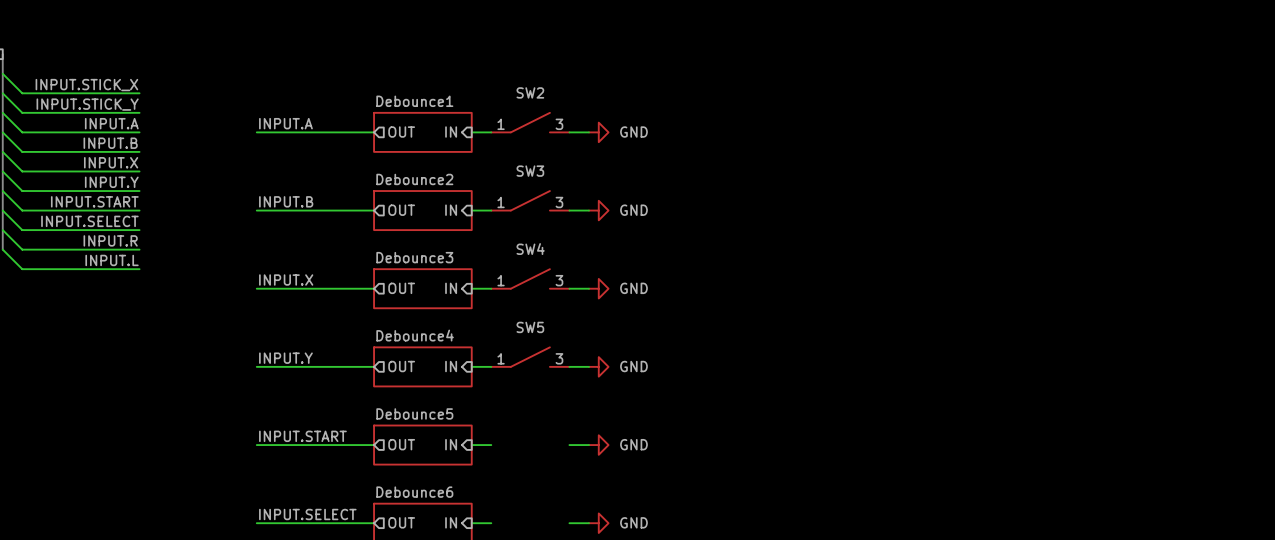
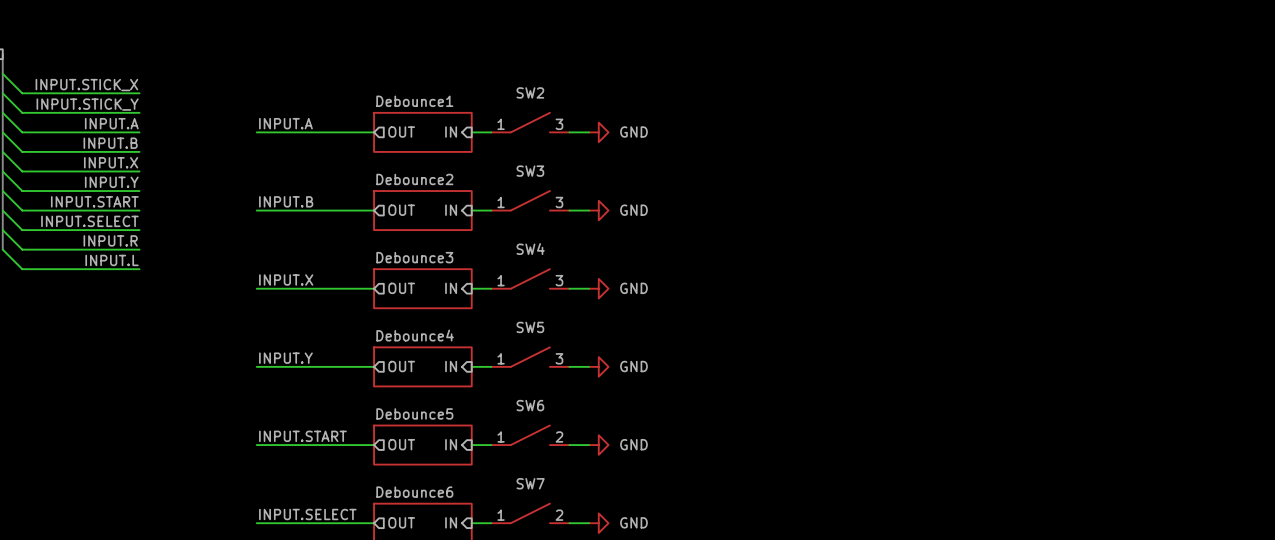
SW6: none -> (530, 435)
SW7: none -> (530, 513)

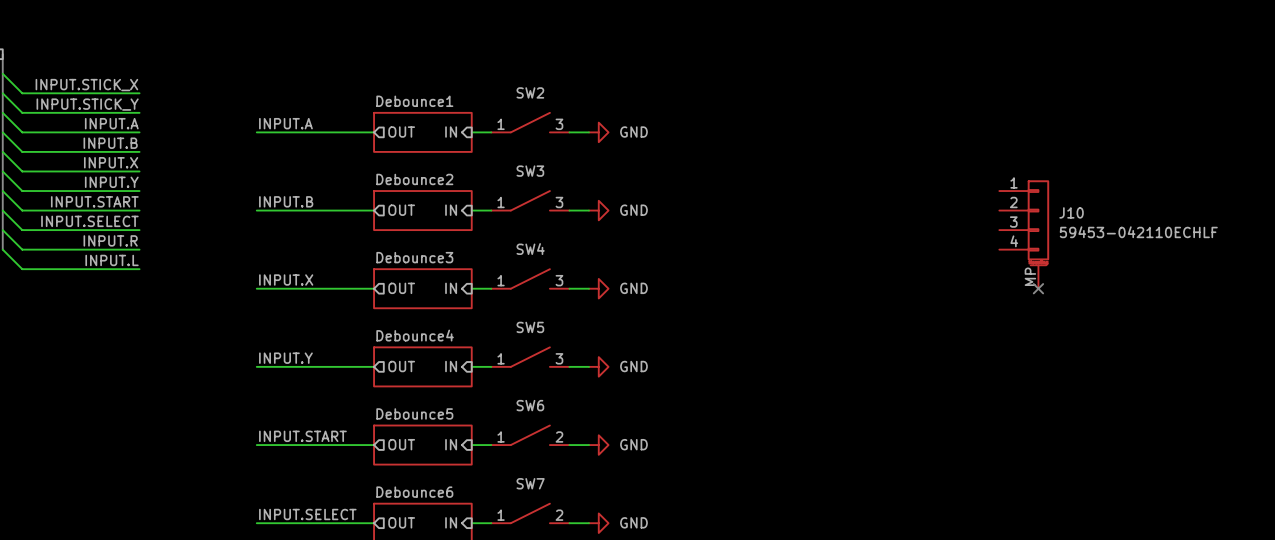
J10: none -> 59453-042110ECHLF (1024, 234)
no-connect mark: none -> (1038, 288)

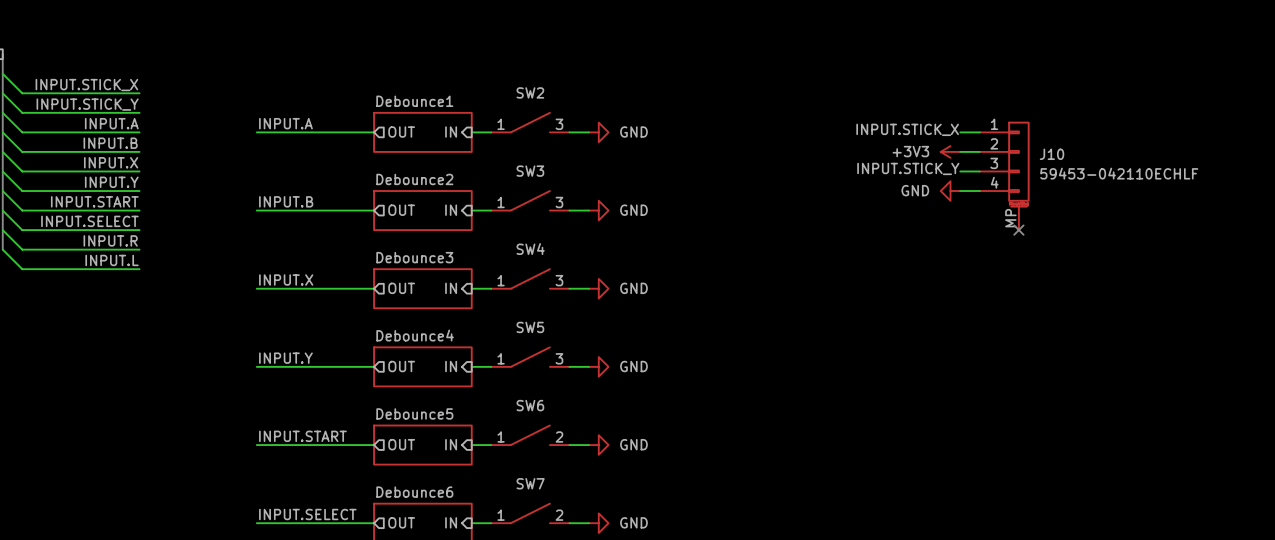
label: none -> INPUT.STICK_X (907, 129)
wire: none -> (960, 132) (979, 132)
power symbol: none -> +3V3 (950, 151)
wire: none -> (960, 151) (979, 151)
label: none -> INPUT.STICK_Y (908, 168)
wire: none -> (960, 171) (979, 171)
power symbol: none -> GND (950, 191)
wire: none -> (960, 191) (979, 191)
no-connect mark: none -> (1018, 230)
J10 position: (1024, 234) -> (1004, 175)
no-connect mark: (1038, 288) -> none

